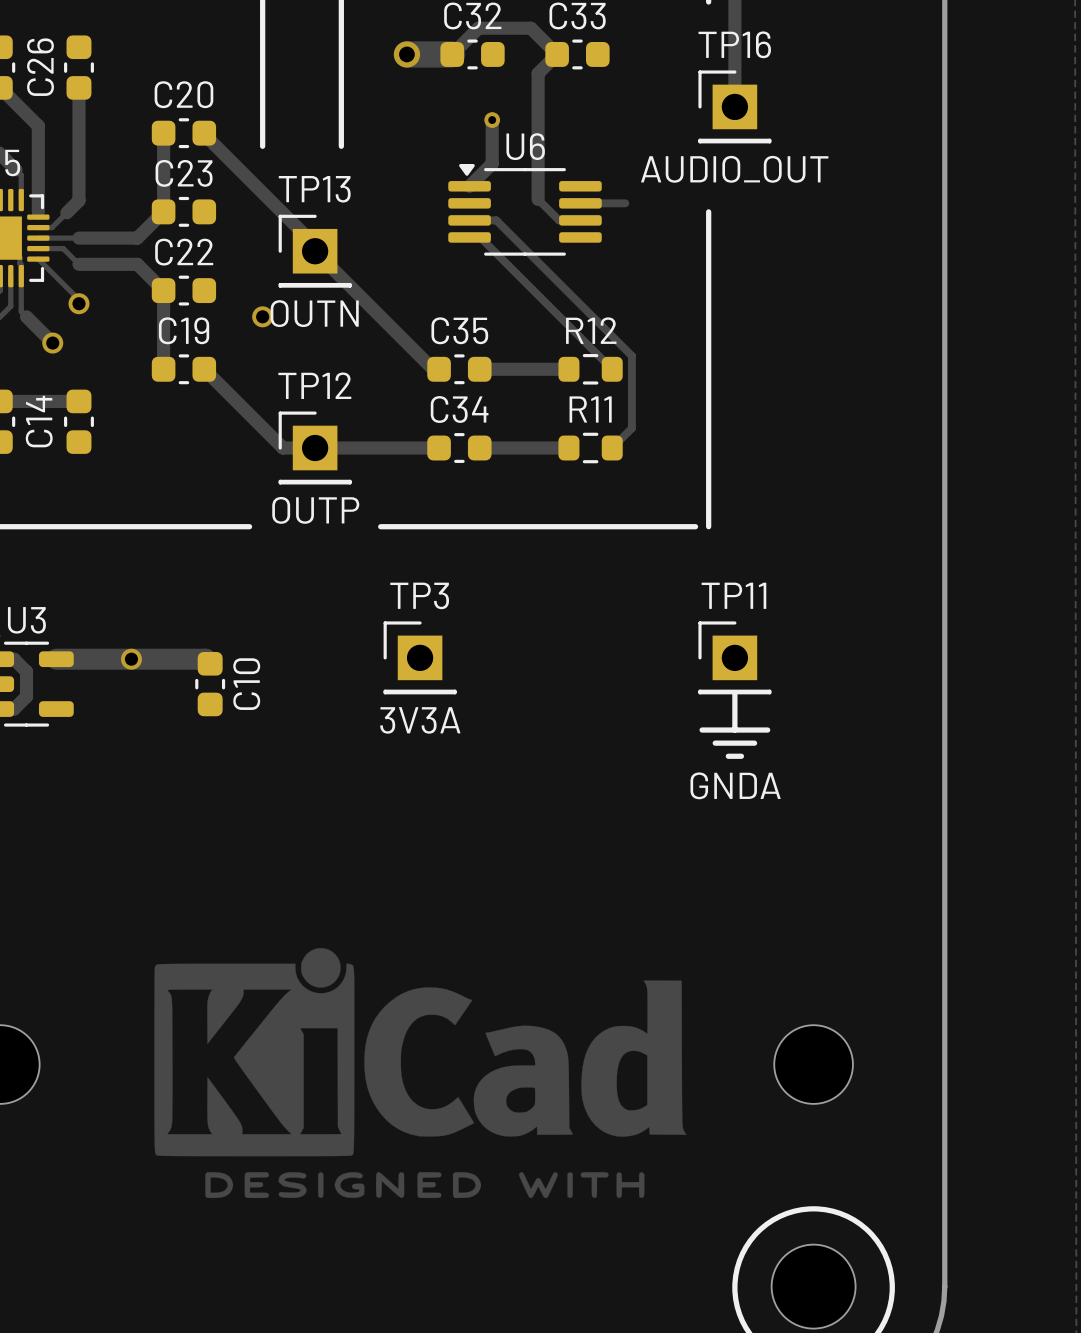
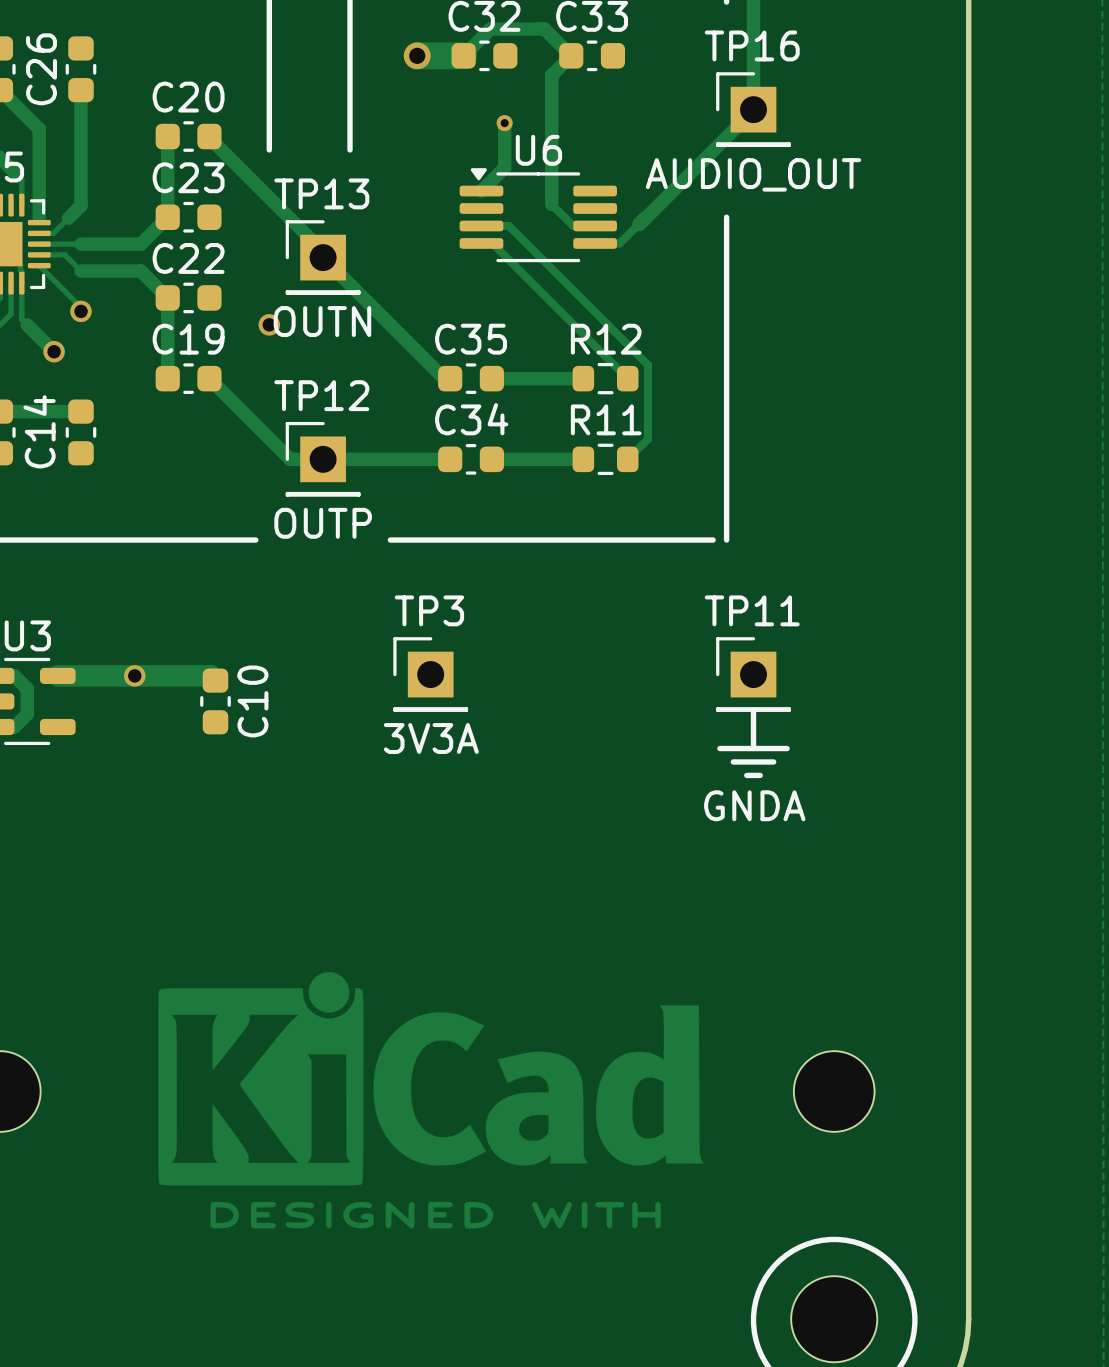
track: none -> (753, 110) (619, 243) (595, 243)
track: (580, 203) (625, 203) -> none

